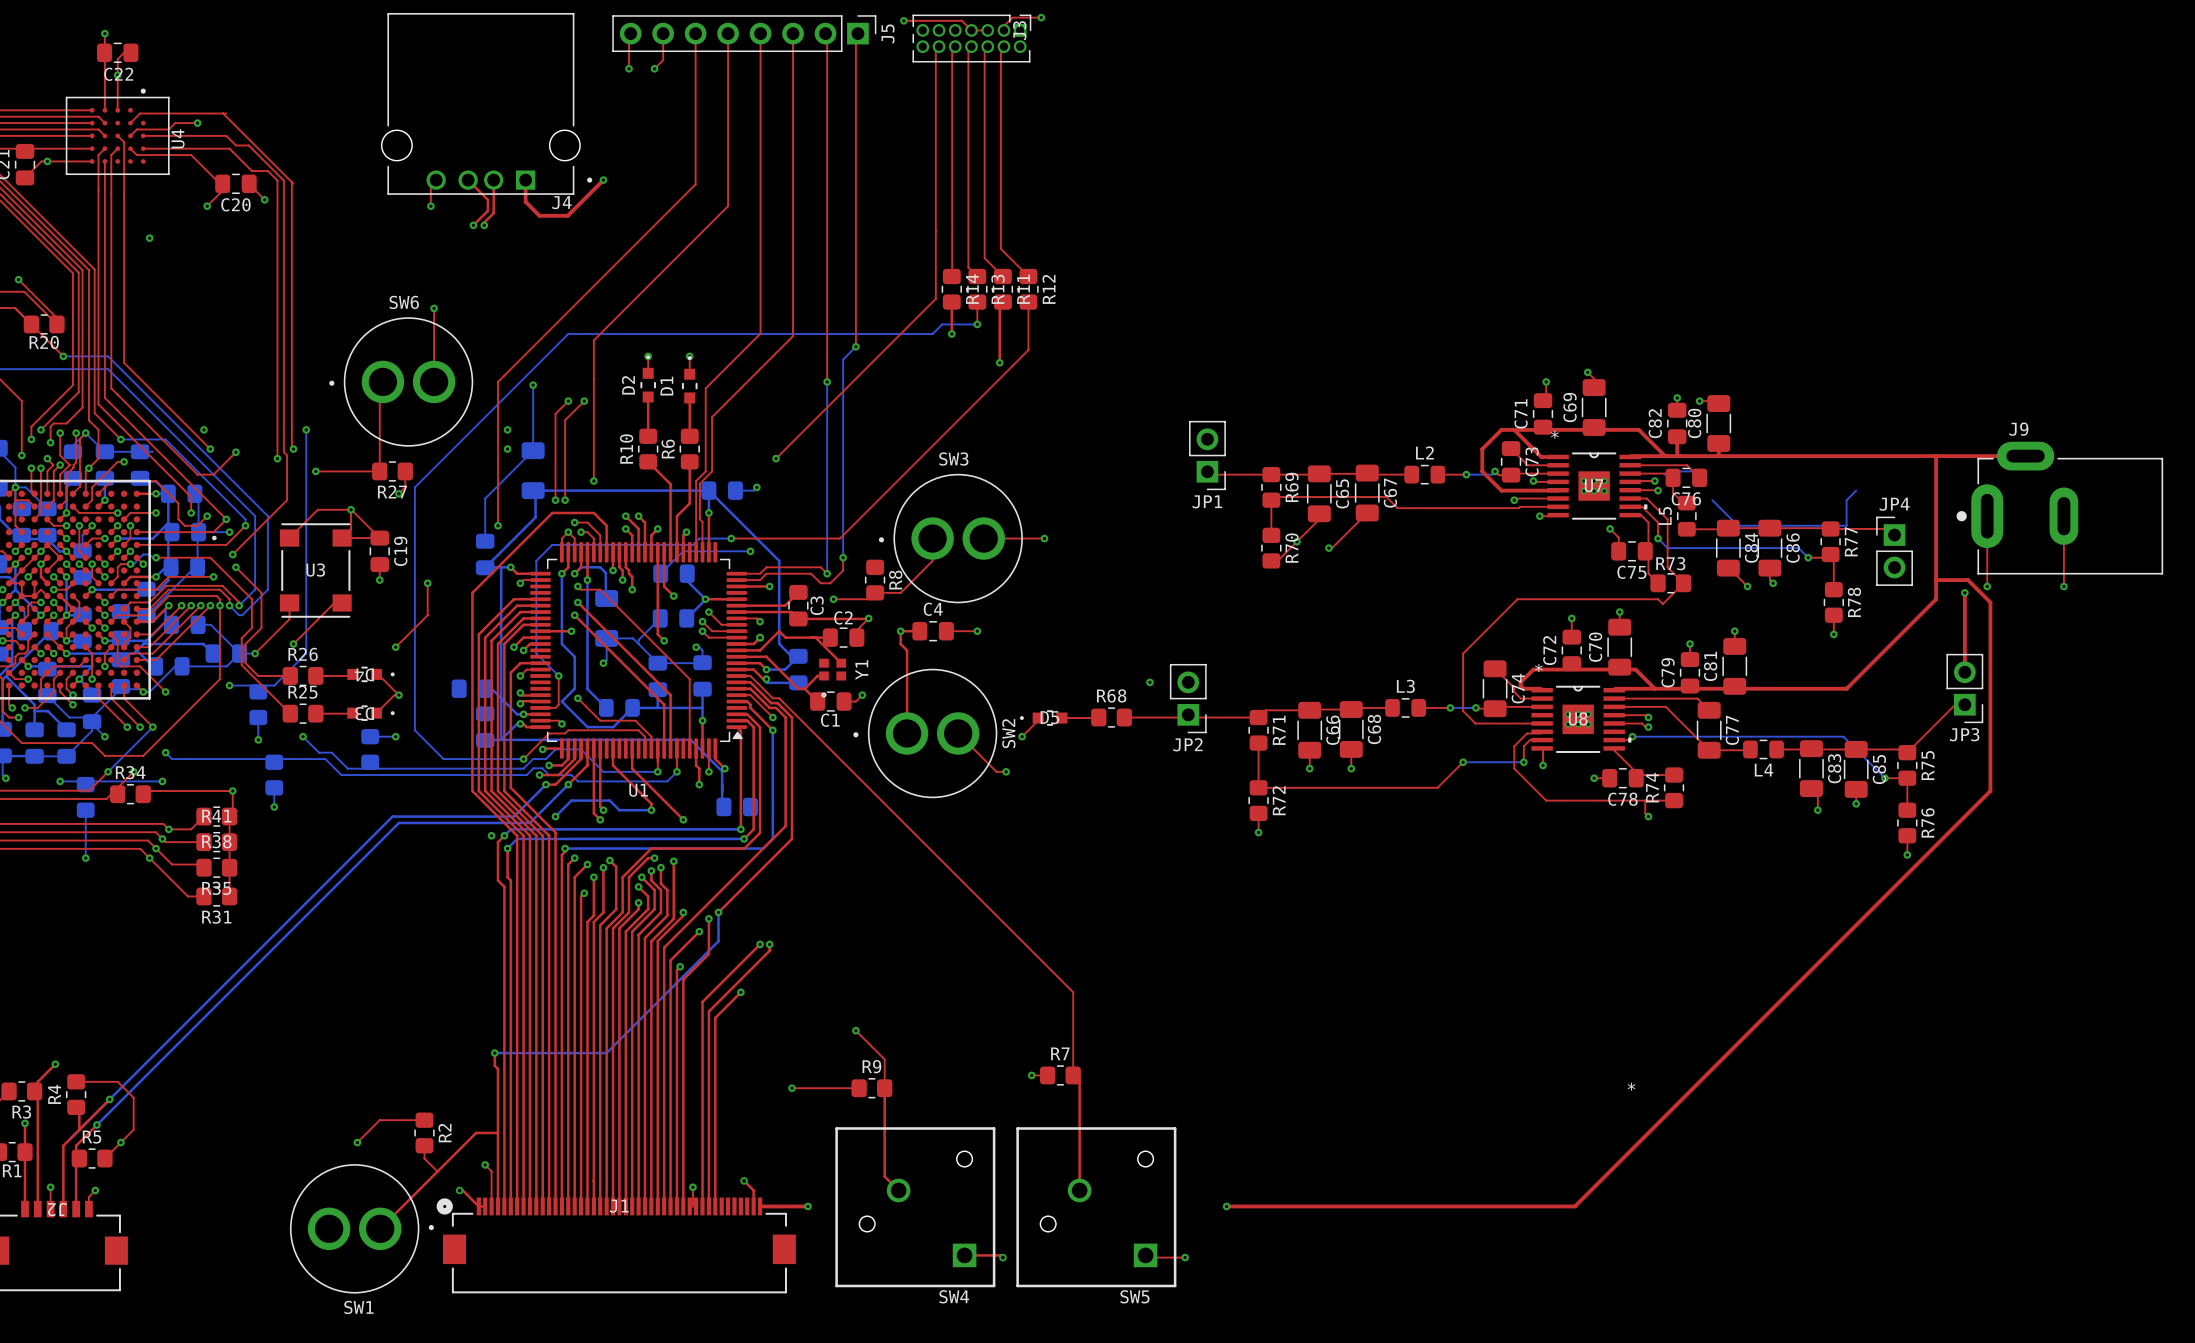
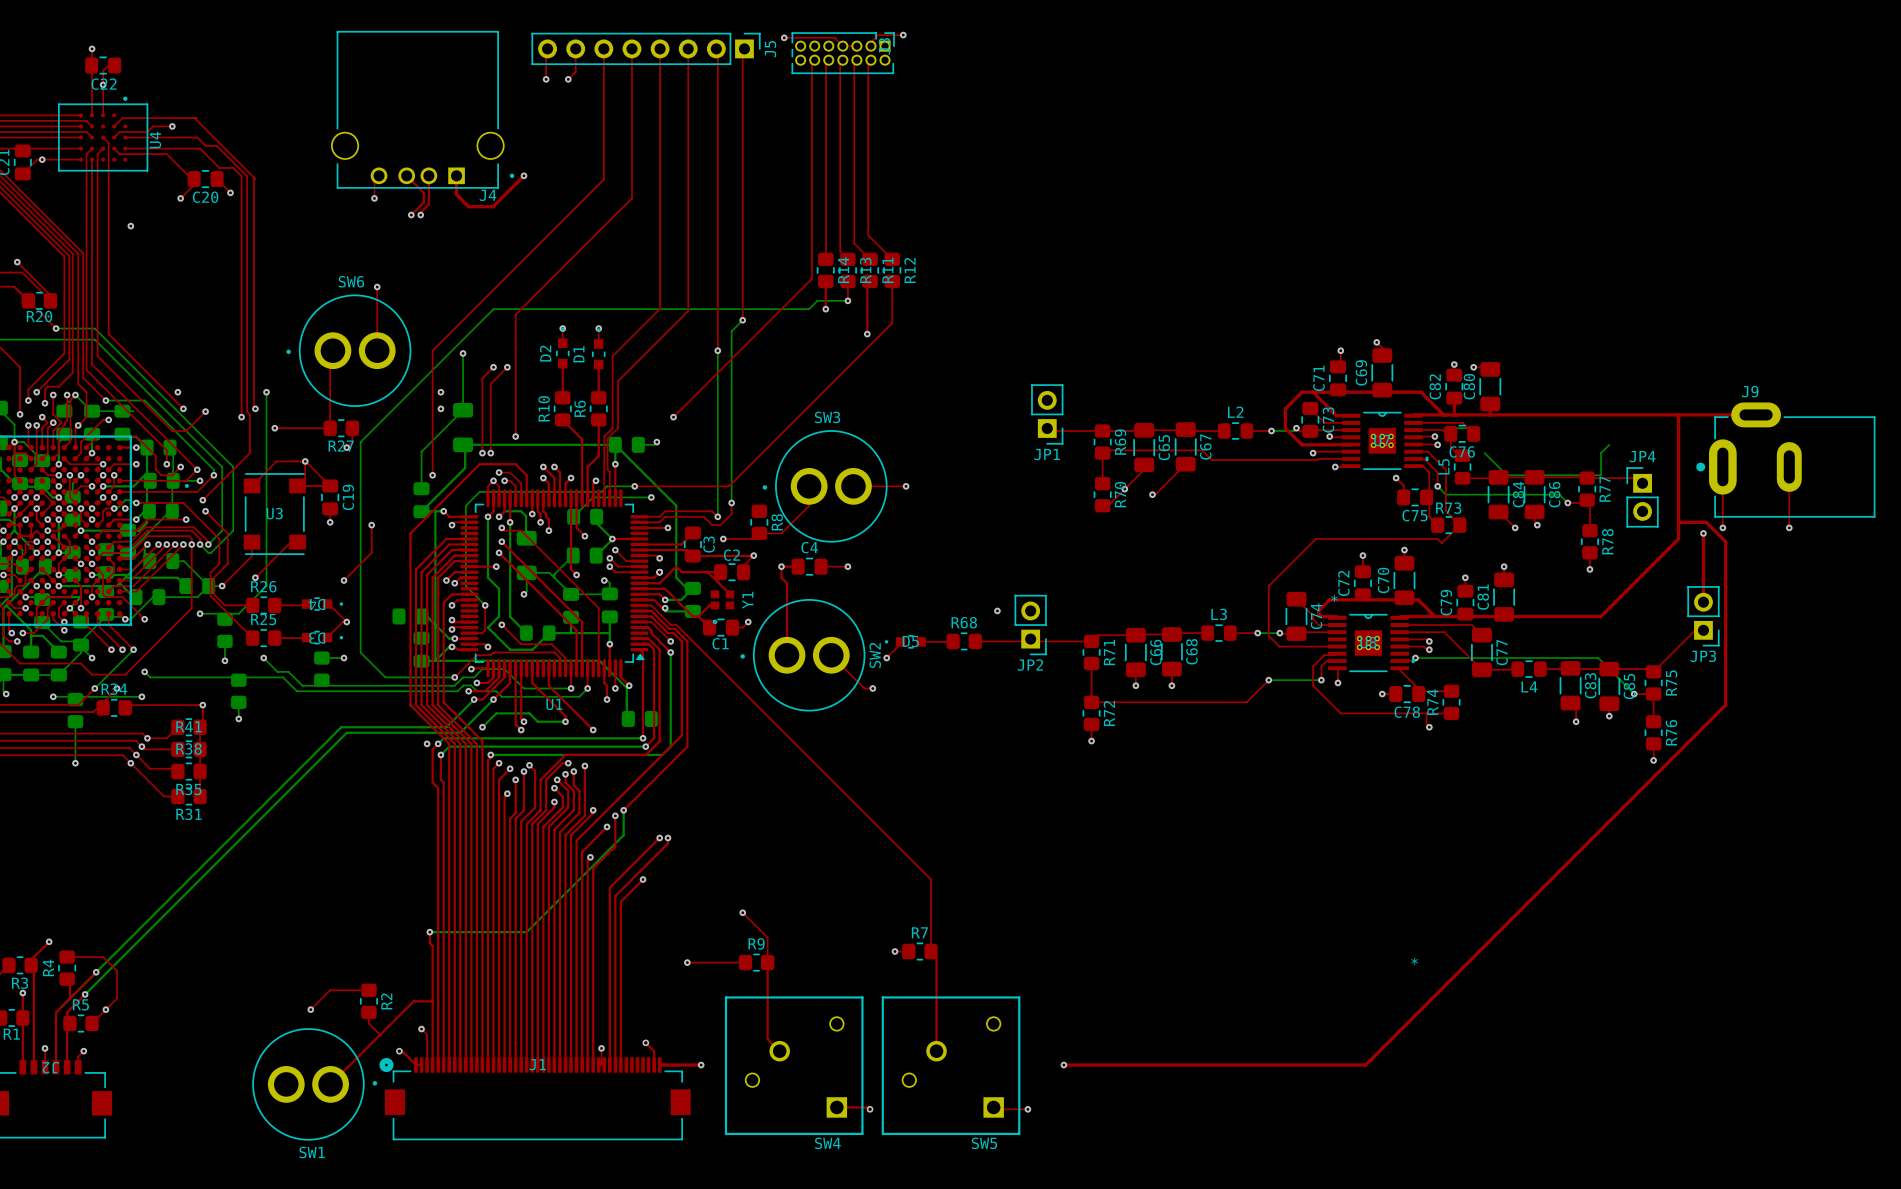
U7 text: * (1554, 434) -> none

